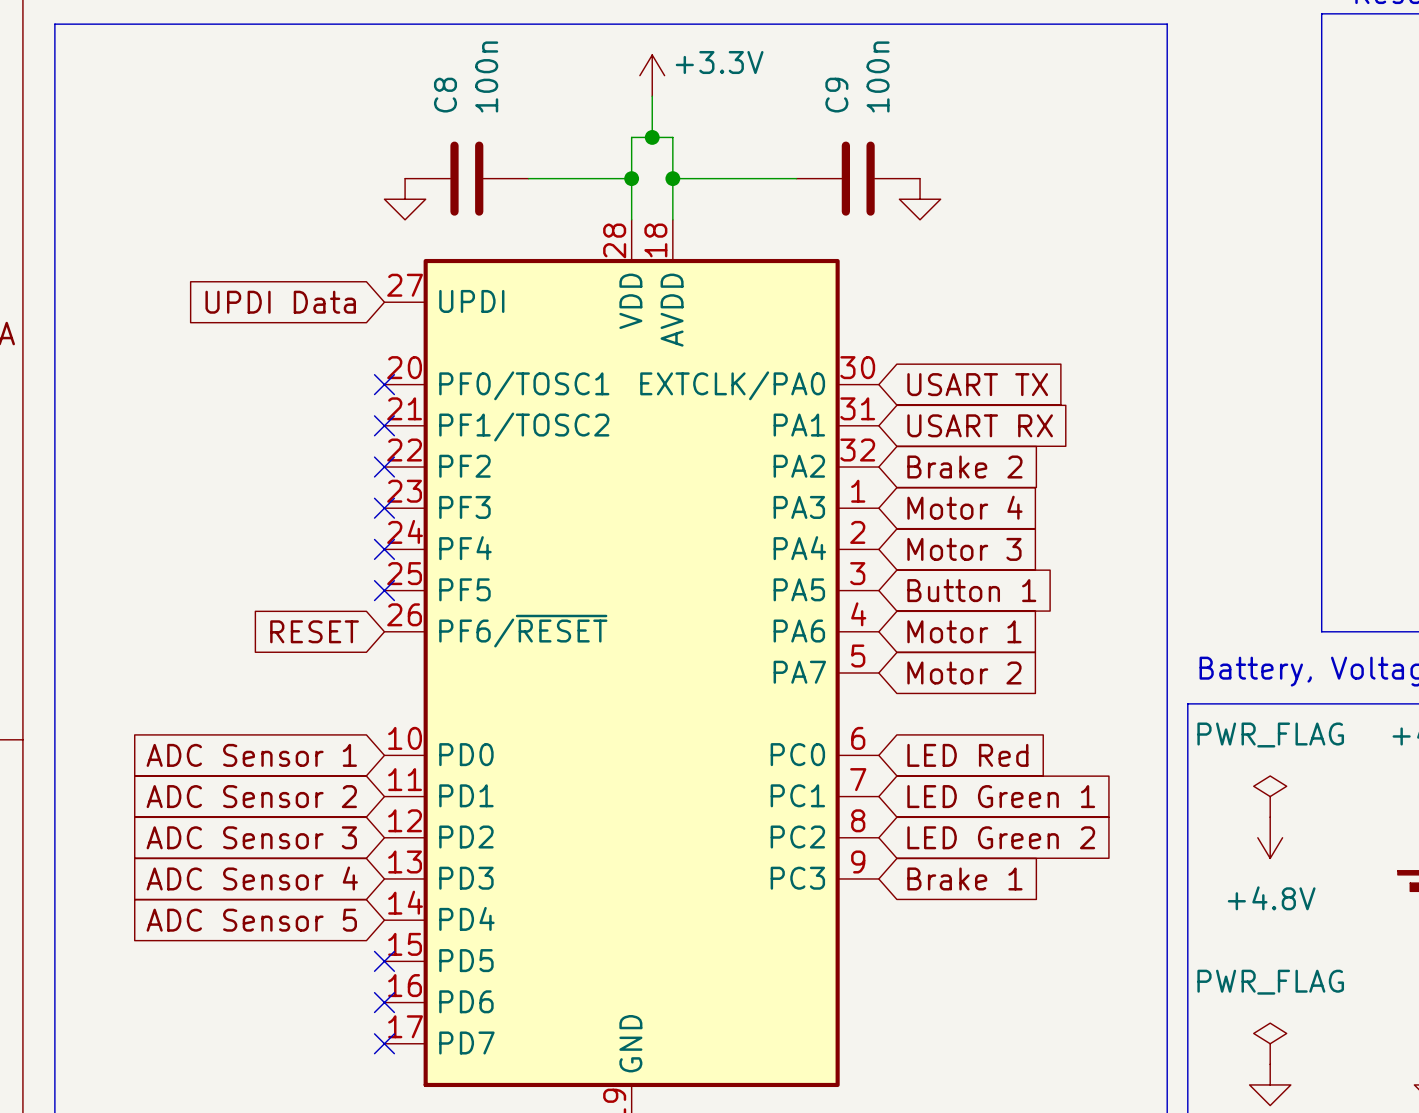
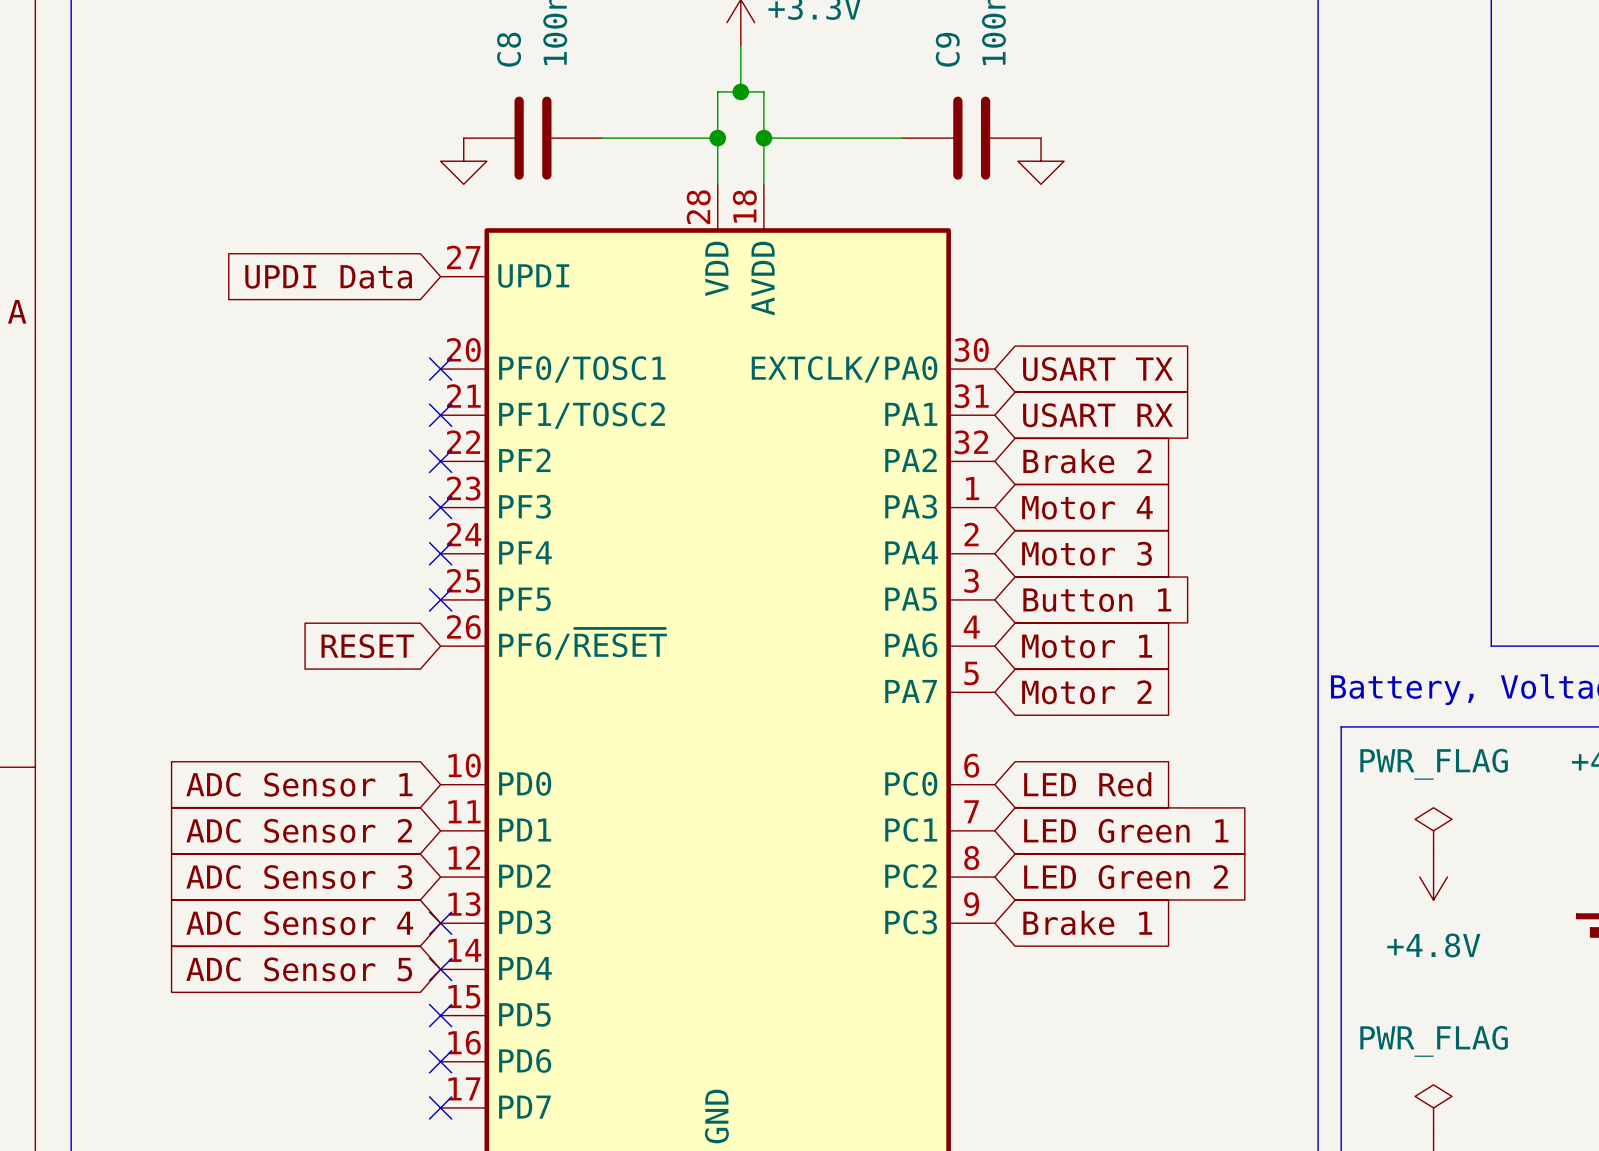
no-connect mark: none -> (440, 923)
no-connect mark: none -> (440, 969)

